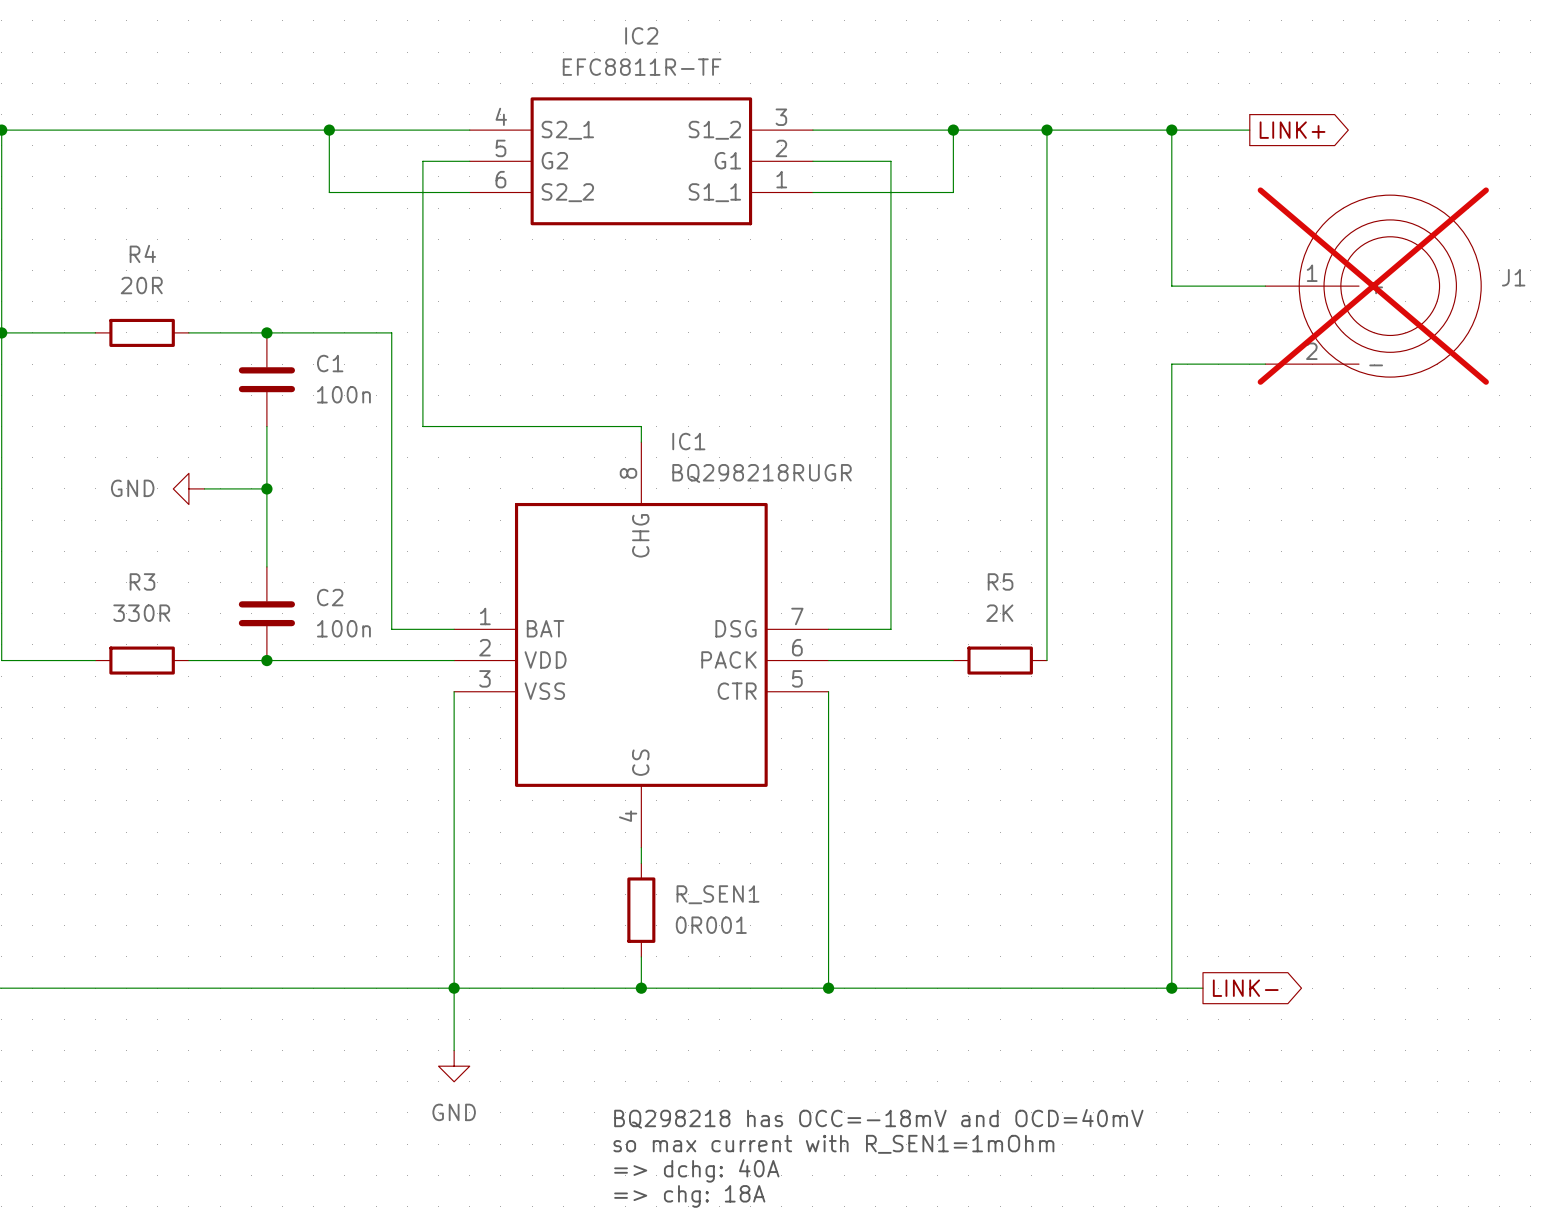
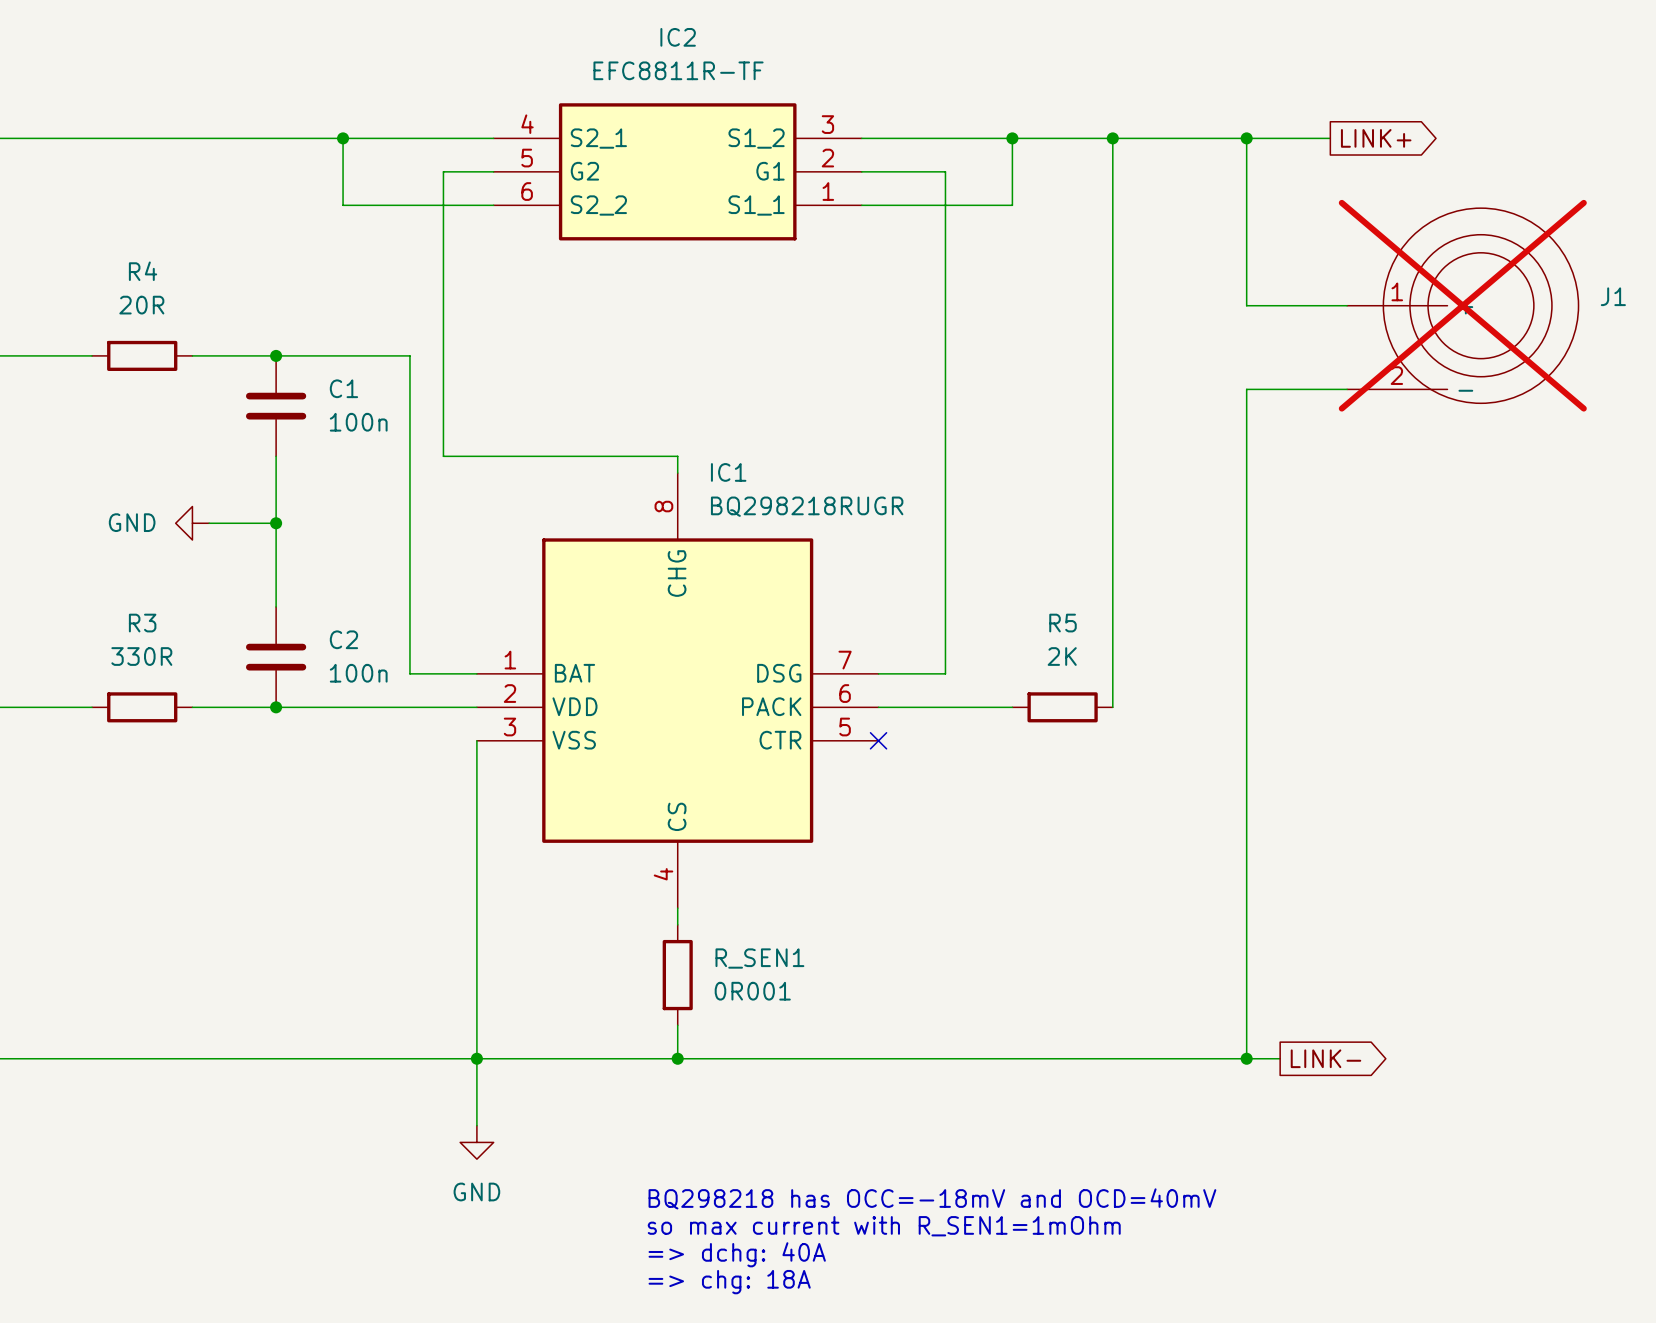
wire: (828, 691) (828, 988) -> none
no-connect mark: none -> (878, 740)
junction: (828, 988) -> none

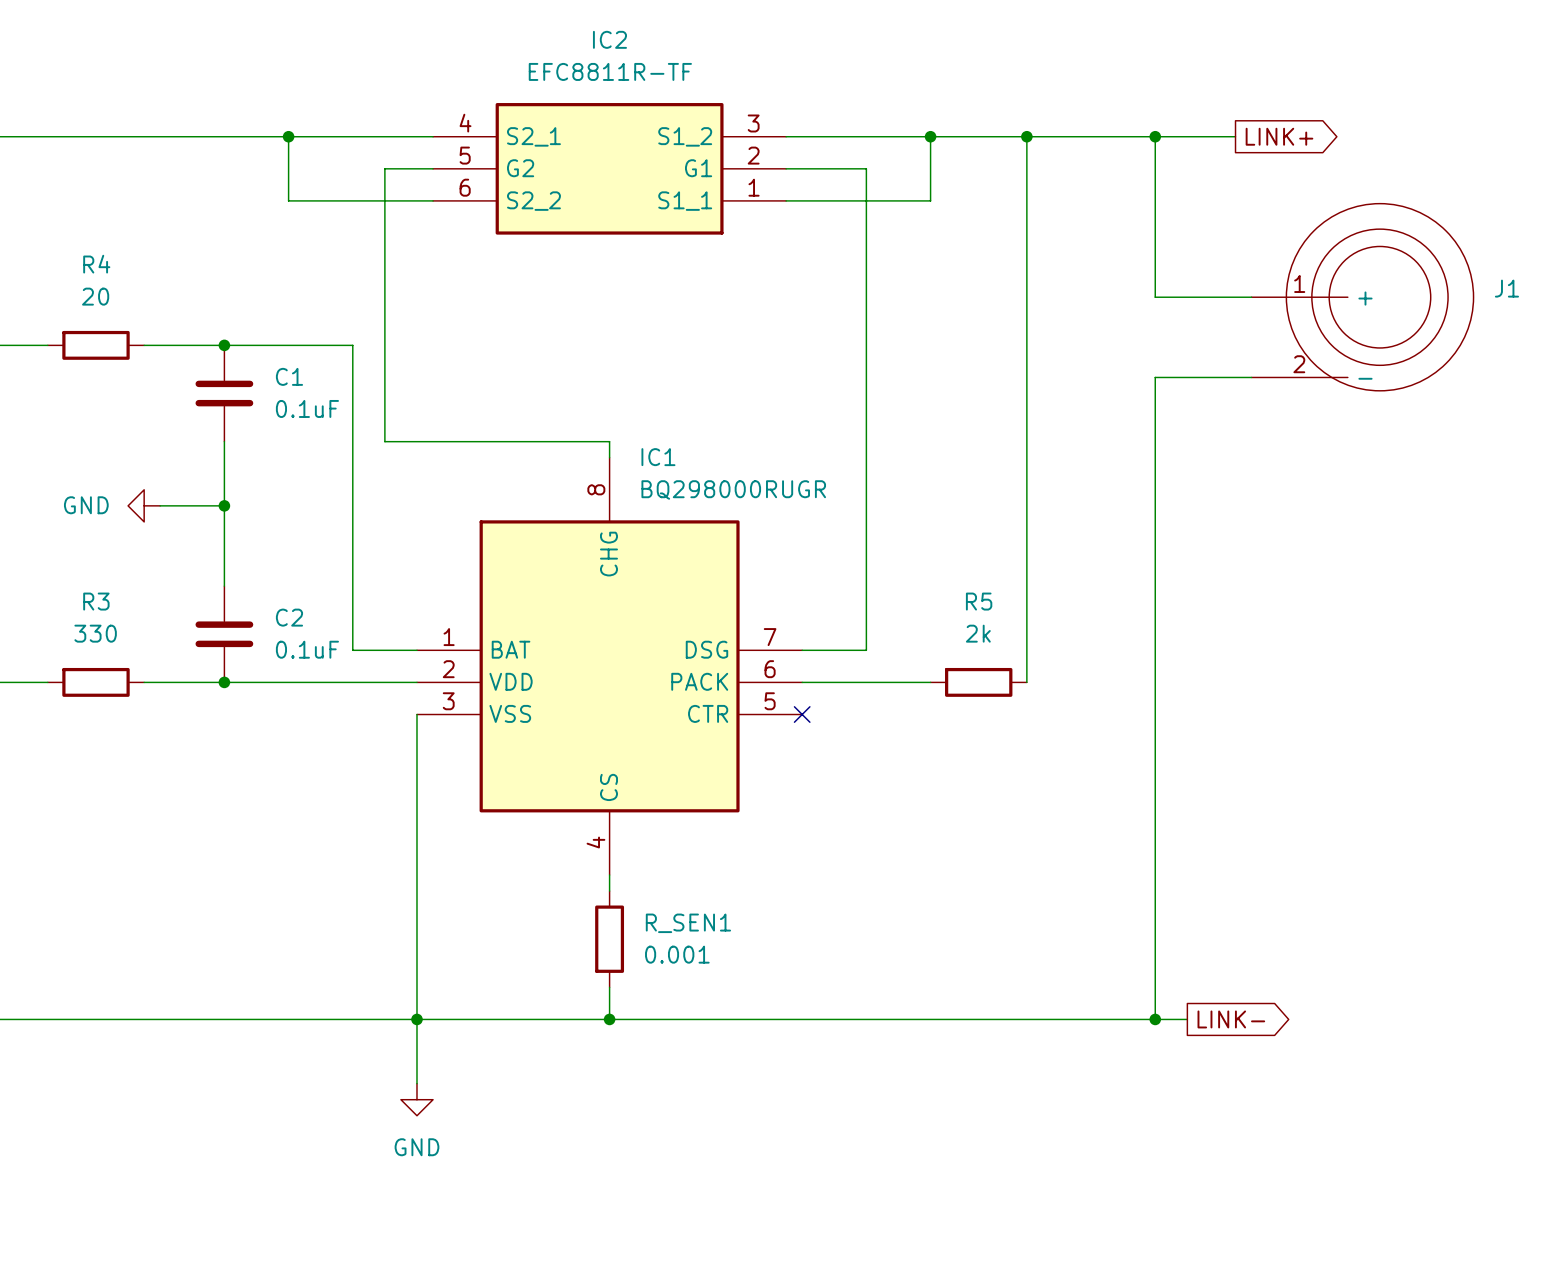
R4 value: 20R (141, 305) -> 20 (95, 296)
J1 do-not-place cross: (1462, 305) -> none
C1 value: 100n (358, 422) -> 0.1uF (307, 408)
IC1 value: BQ298218RUGR (807, 506) -> BQ298000RUGR (733, 489)
R3 value: 330R (141, 656) -> 330 (95, 633)
R5 value: 2K (1062, 656) -> 2k (978, 633)
C2 value: 100n (358, 673) -> 0.1uF (307, 649)
R_SEN1 value: 0R001 (752, 991) -> 0.001 (677, 954)
text: BQ298218 has OCC=-18mV and OCD=40mV (932, 1198) -> none
text: so max current with R_SEN1=1mOhm (884, 1226) -> none
text: => dchg: 40A (737, 1254) -> none
text: => chg: 18A (729, 1282) -> none

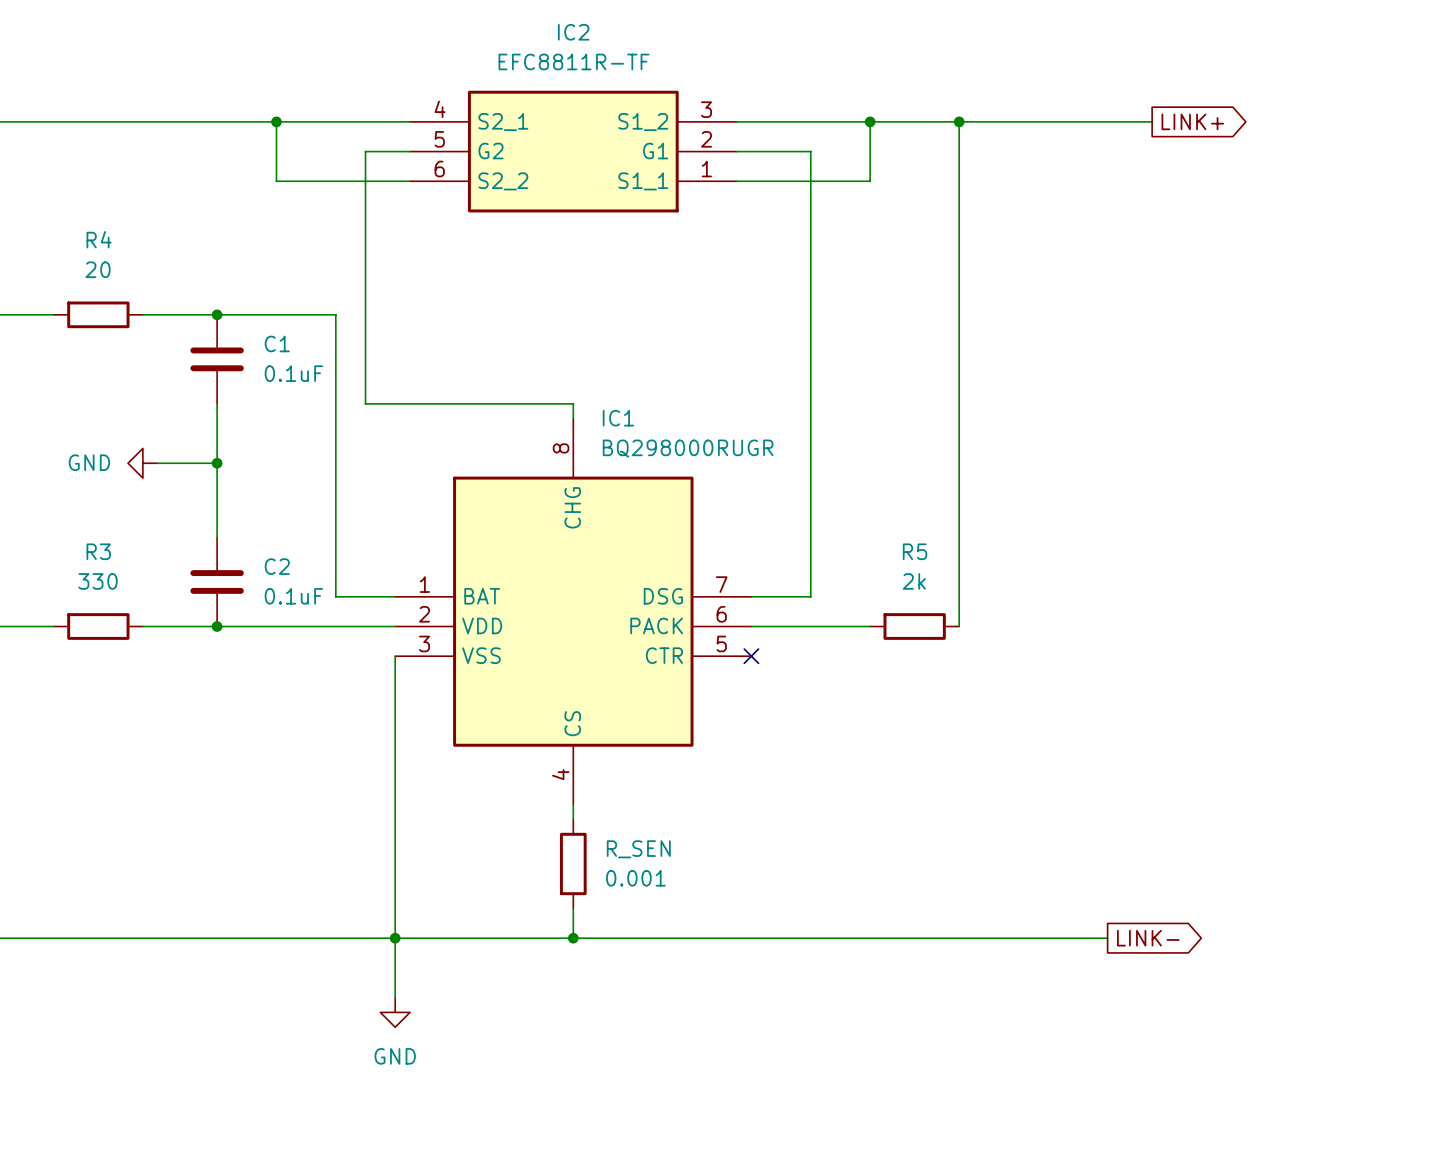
wire: (1155, 136) (1155, 297) (1251, 297) -> none
junction: (1155, 136) -> none
J1: (1362, 297) -> none
wire: (1251, 377) (1155, 377) (1155, 1019) -> none
R_SEN1 name: R_SEN1 (688, 923) -> R_SEN (638, 849)
junction: (1155, 1019) -> none

